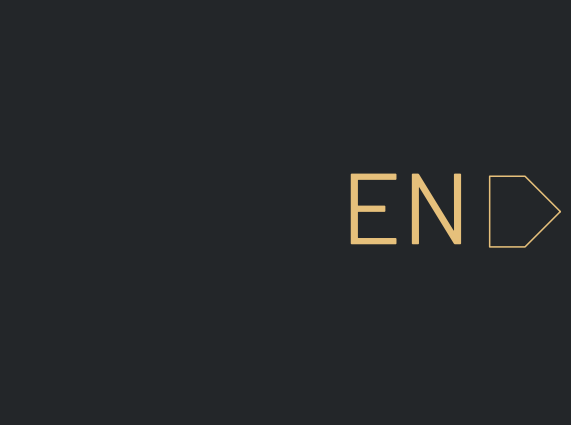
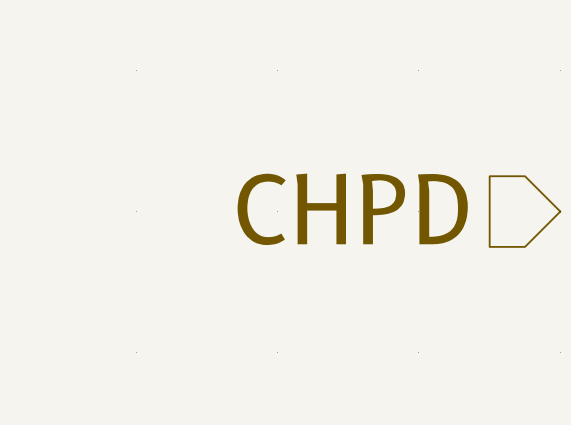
hierarchical label: EN (405, 208) -> CHPD (352, 209)

